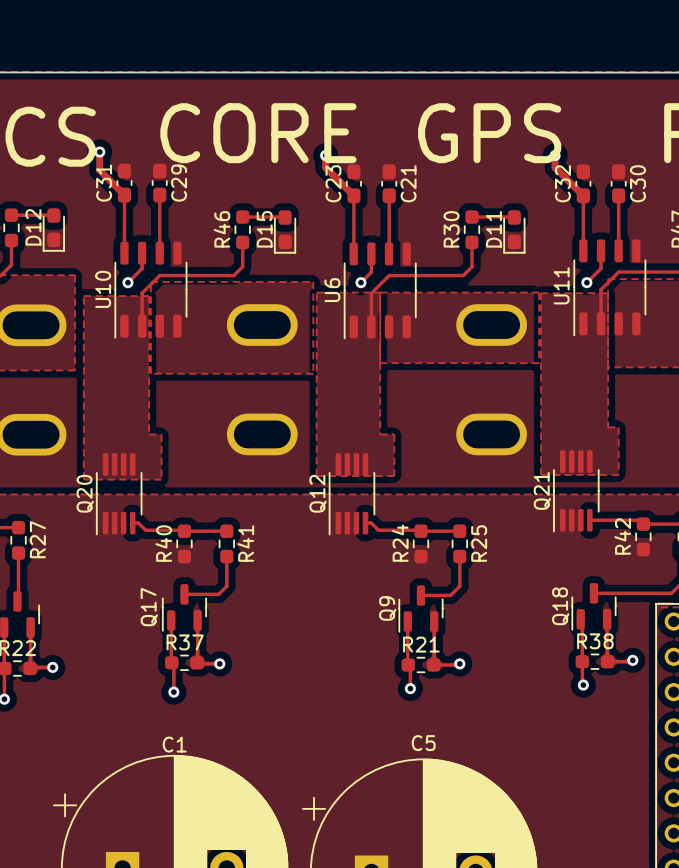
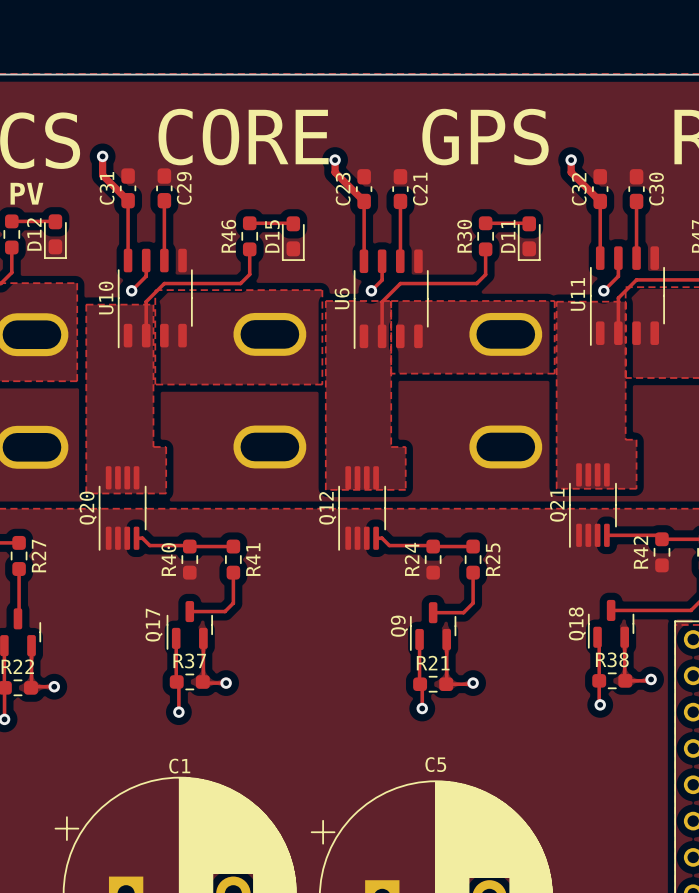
text: none -> PV (26, 193)

